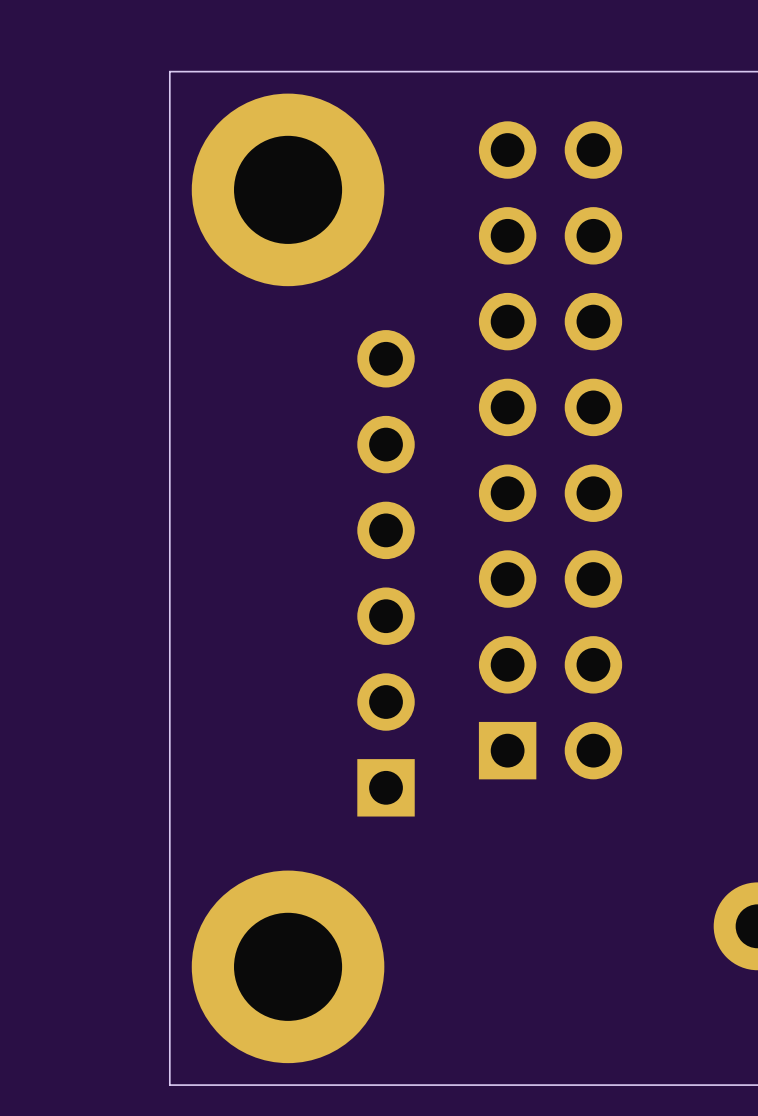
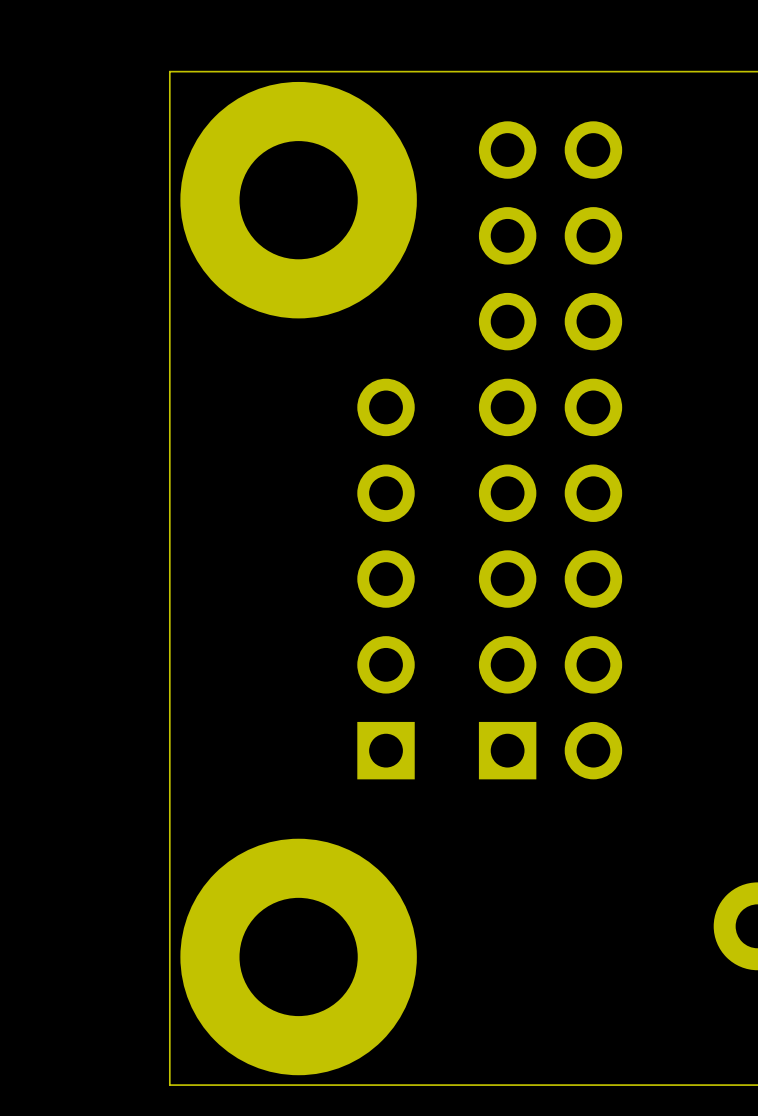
part footprint: [191, 93, 385, 287] -> [180, 81, 417, 319]
part footprint: [357, 330, 415, 817] -> [357, 378, 415, 780]
part footprint: [191, 870, 385, 1064] -> [180, 838, 417, 1076]

